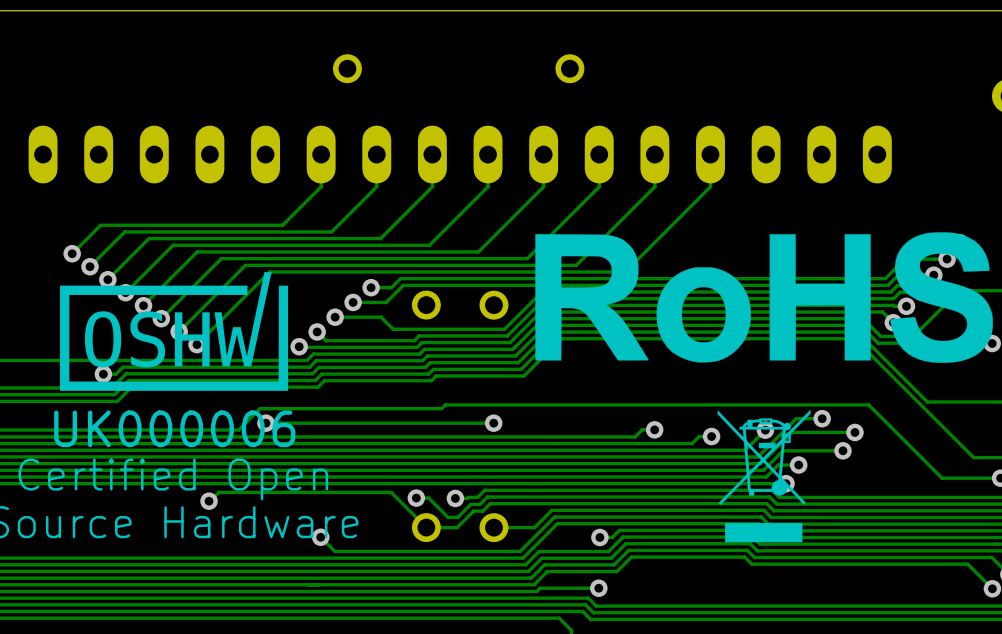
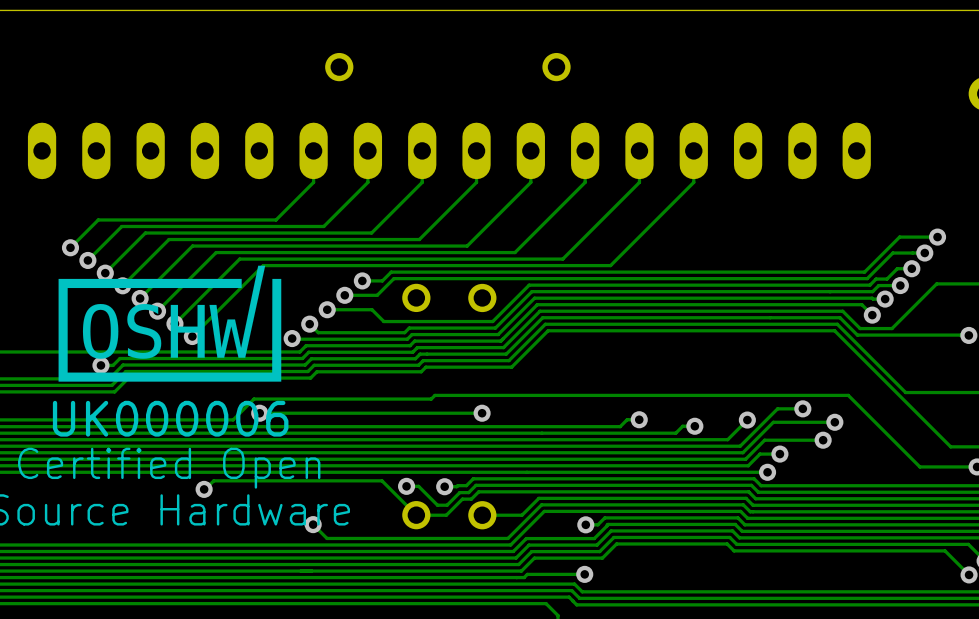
drawing: [535, 232, 993, 363] -> none
drawing: [717, 409, 811, 543] -> none

